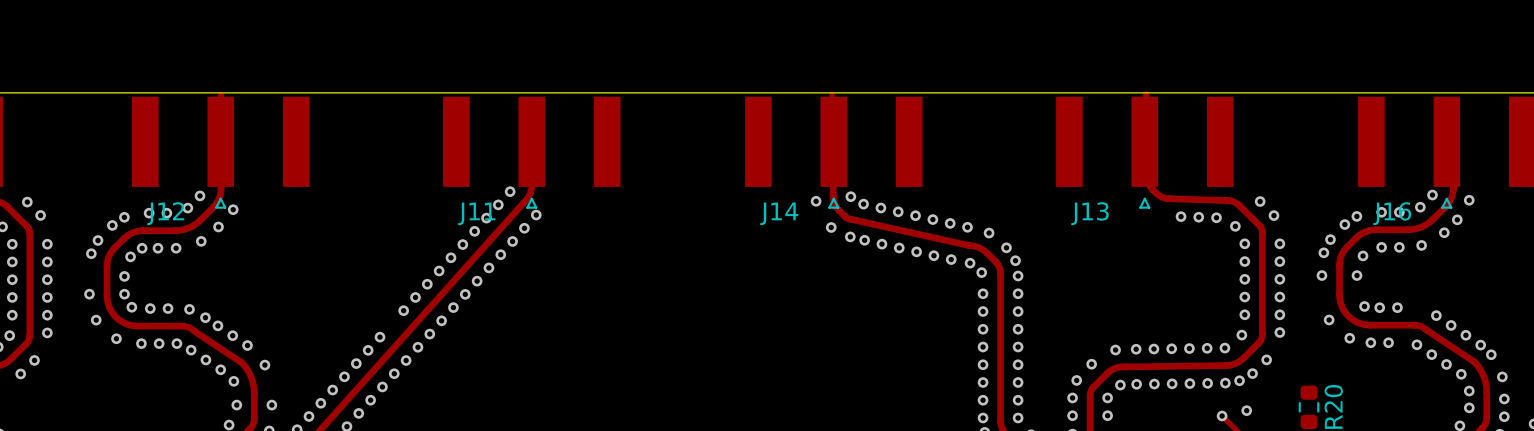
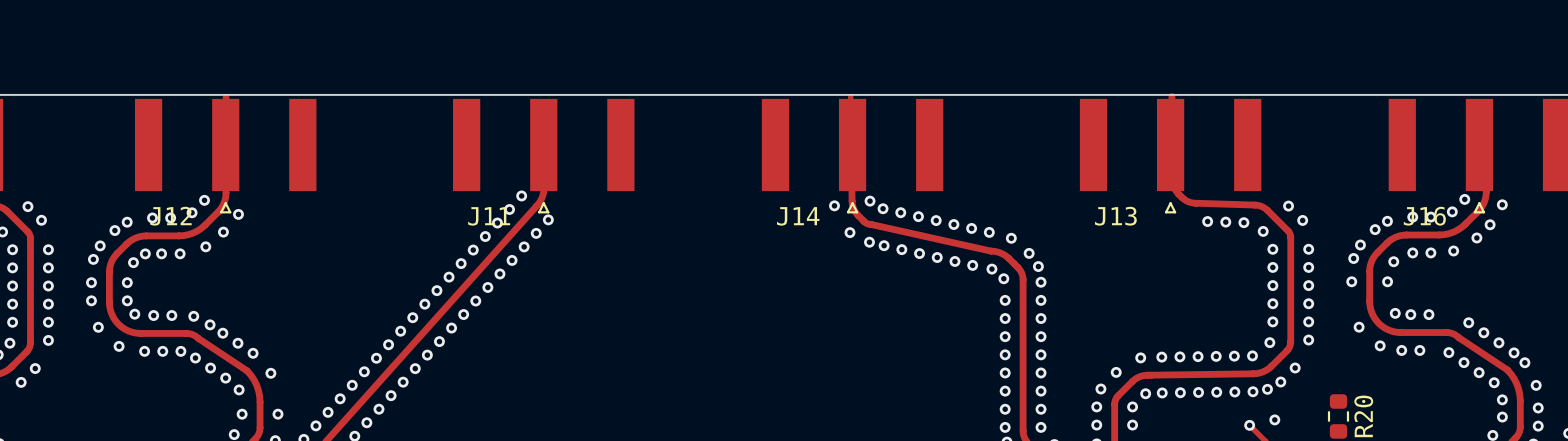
via: none -> (91, 282)
via: none -> (400, 331)

